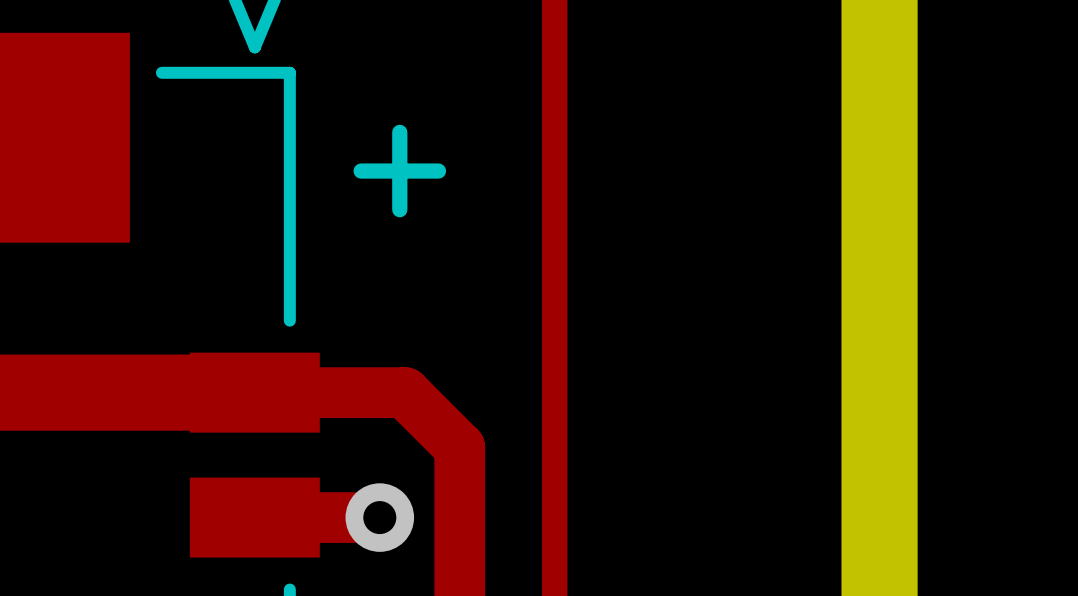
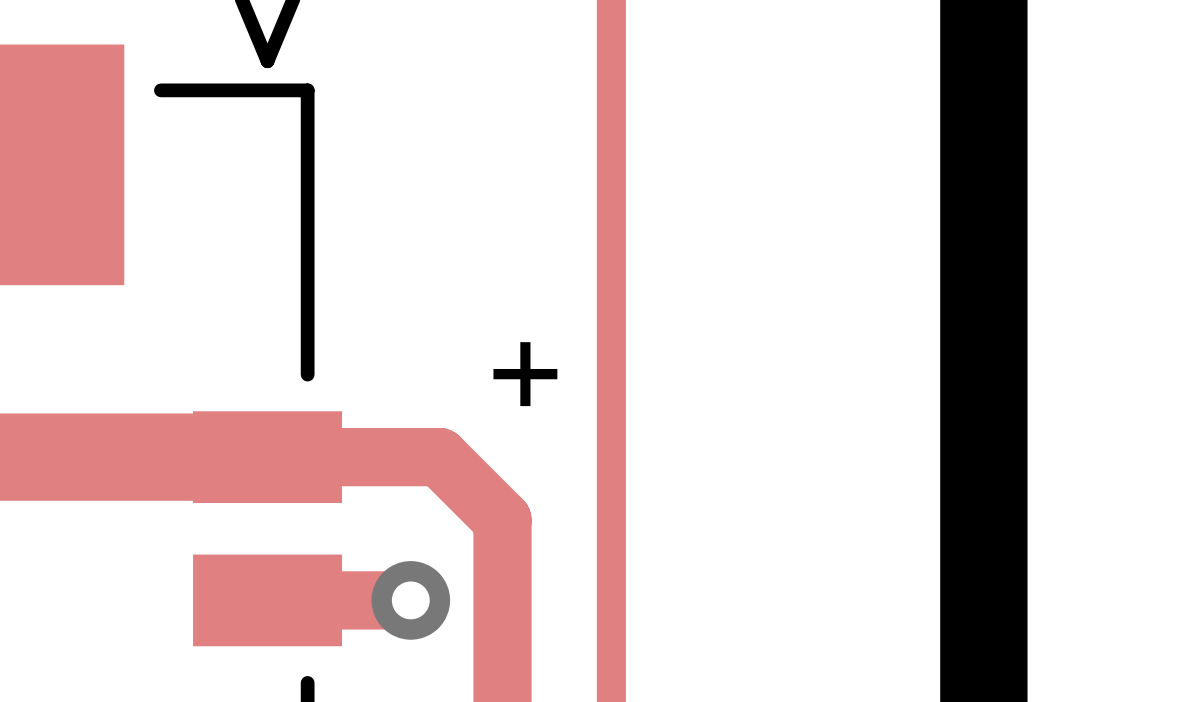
text position: + (399, 171) -> + (525, 374)

